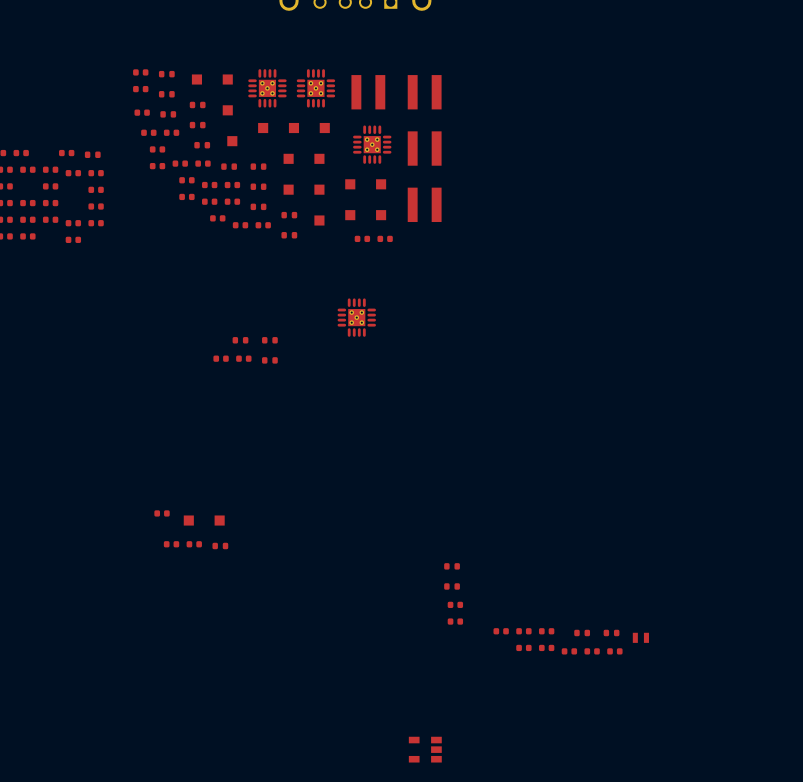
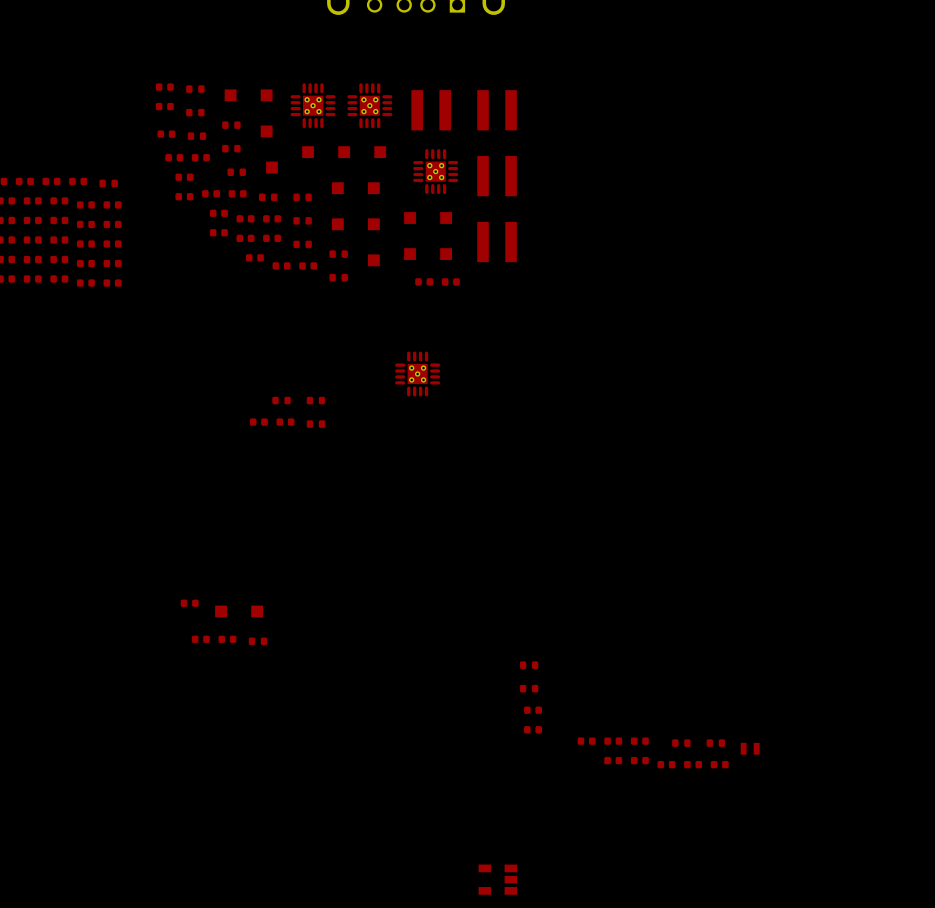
part: none -> (51, 181)
part: none -> (32, 220)
part: none -> (85, 224)
part: none -> (85, 243)
part: none -> (59, 279)
part: none -> (112, 283)

